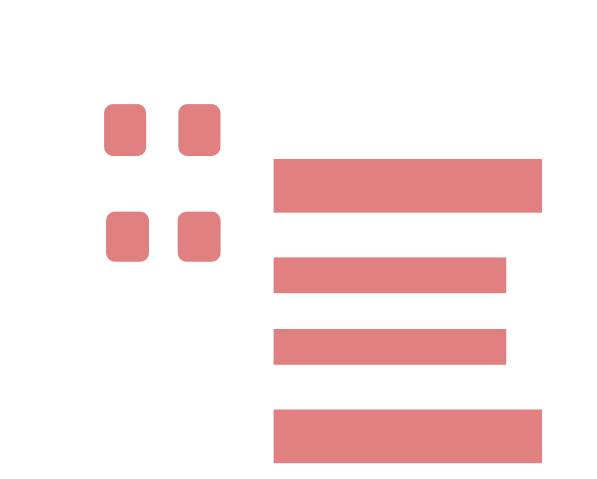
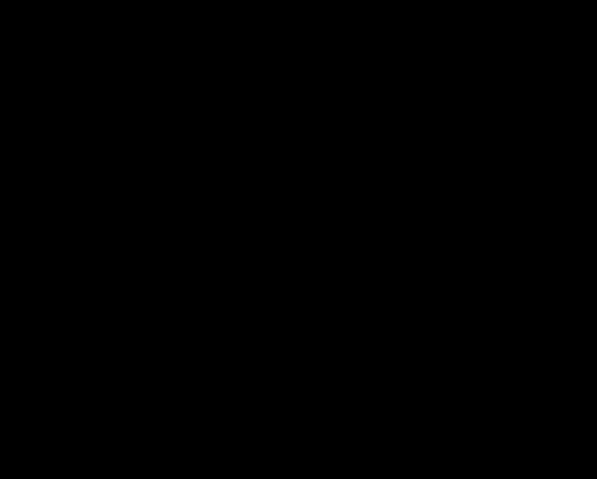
part: (162, 130) -> none
part: (163, 236) -> none
part: (407, 311) -> none

